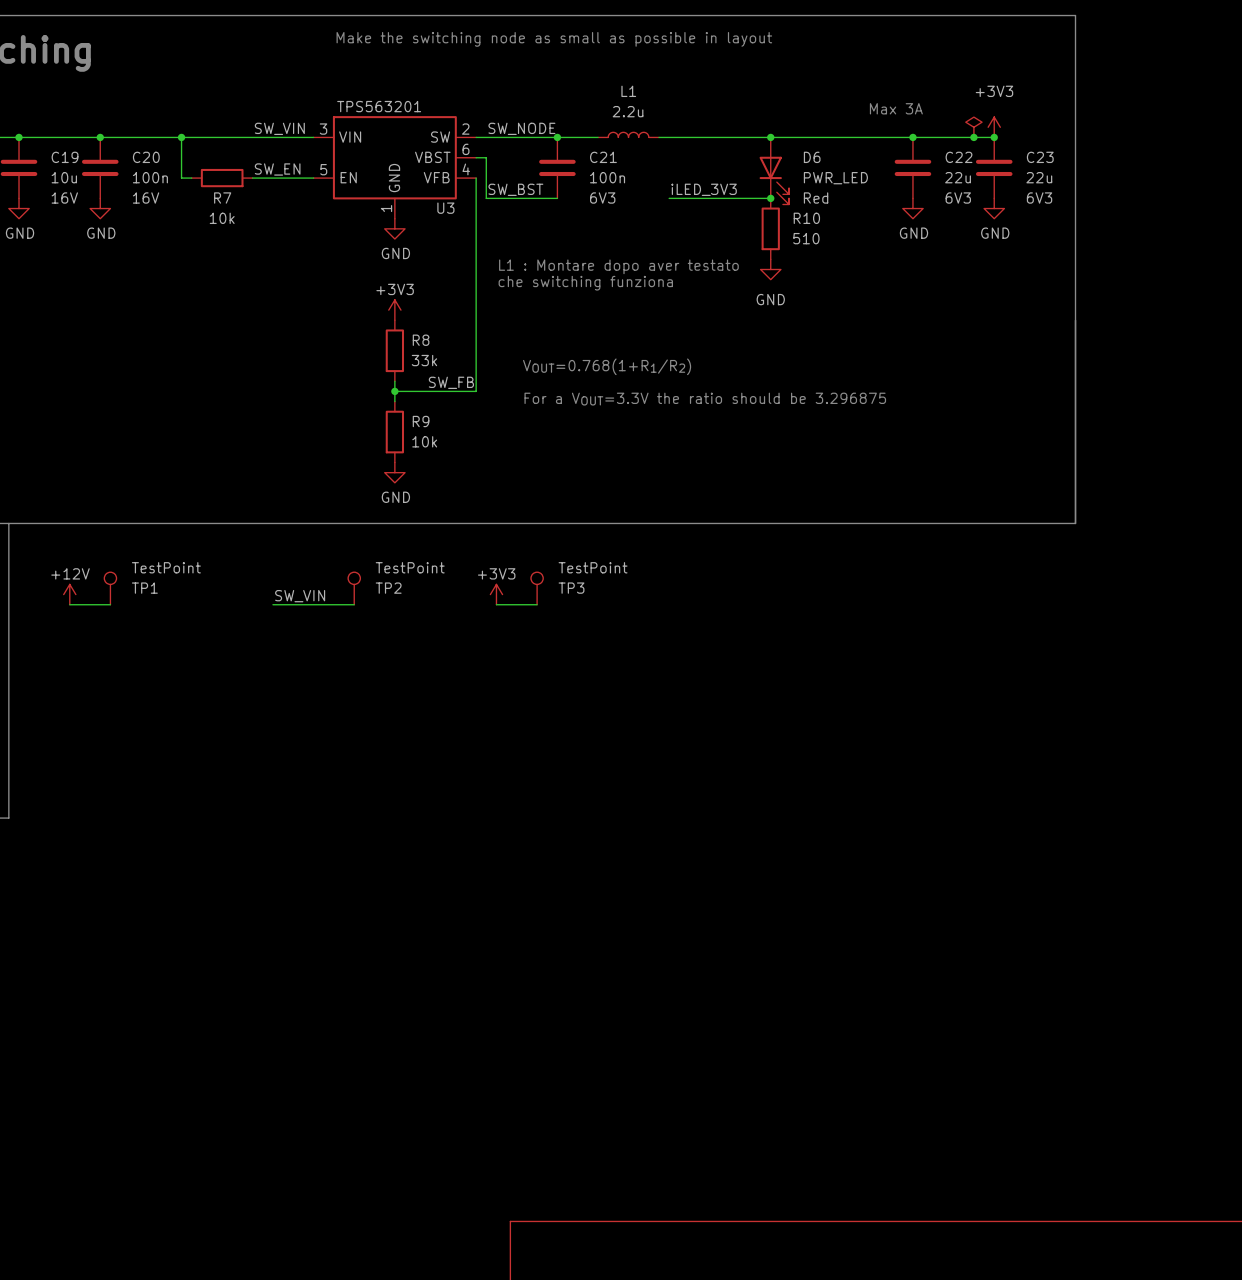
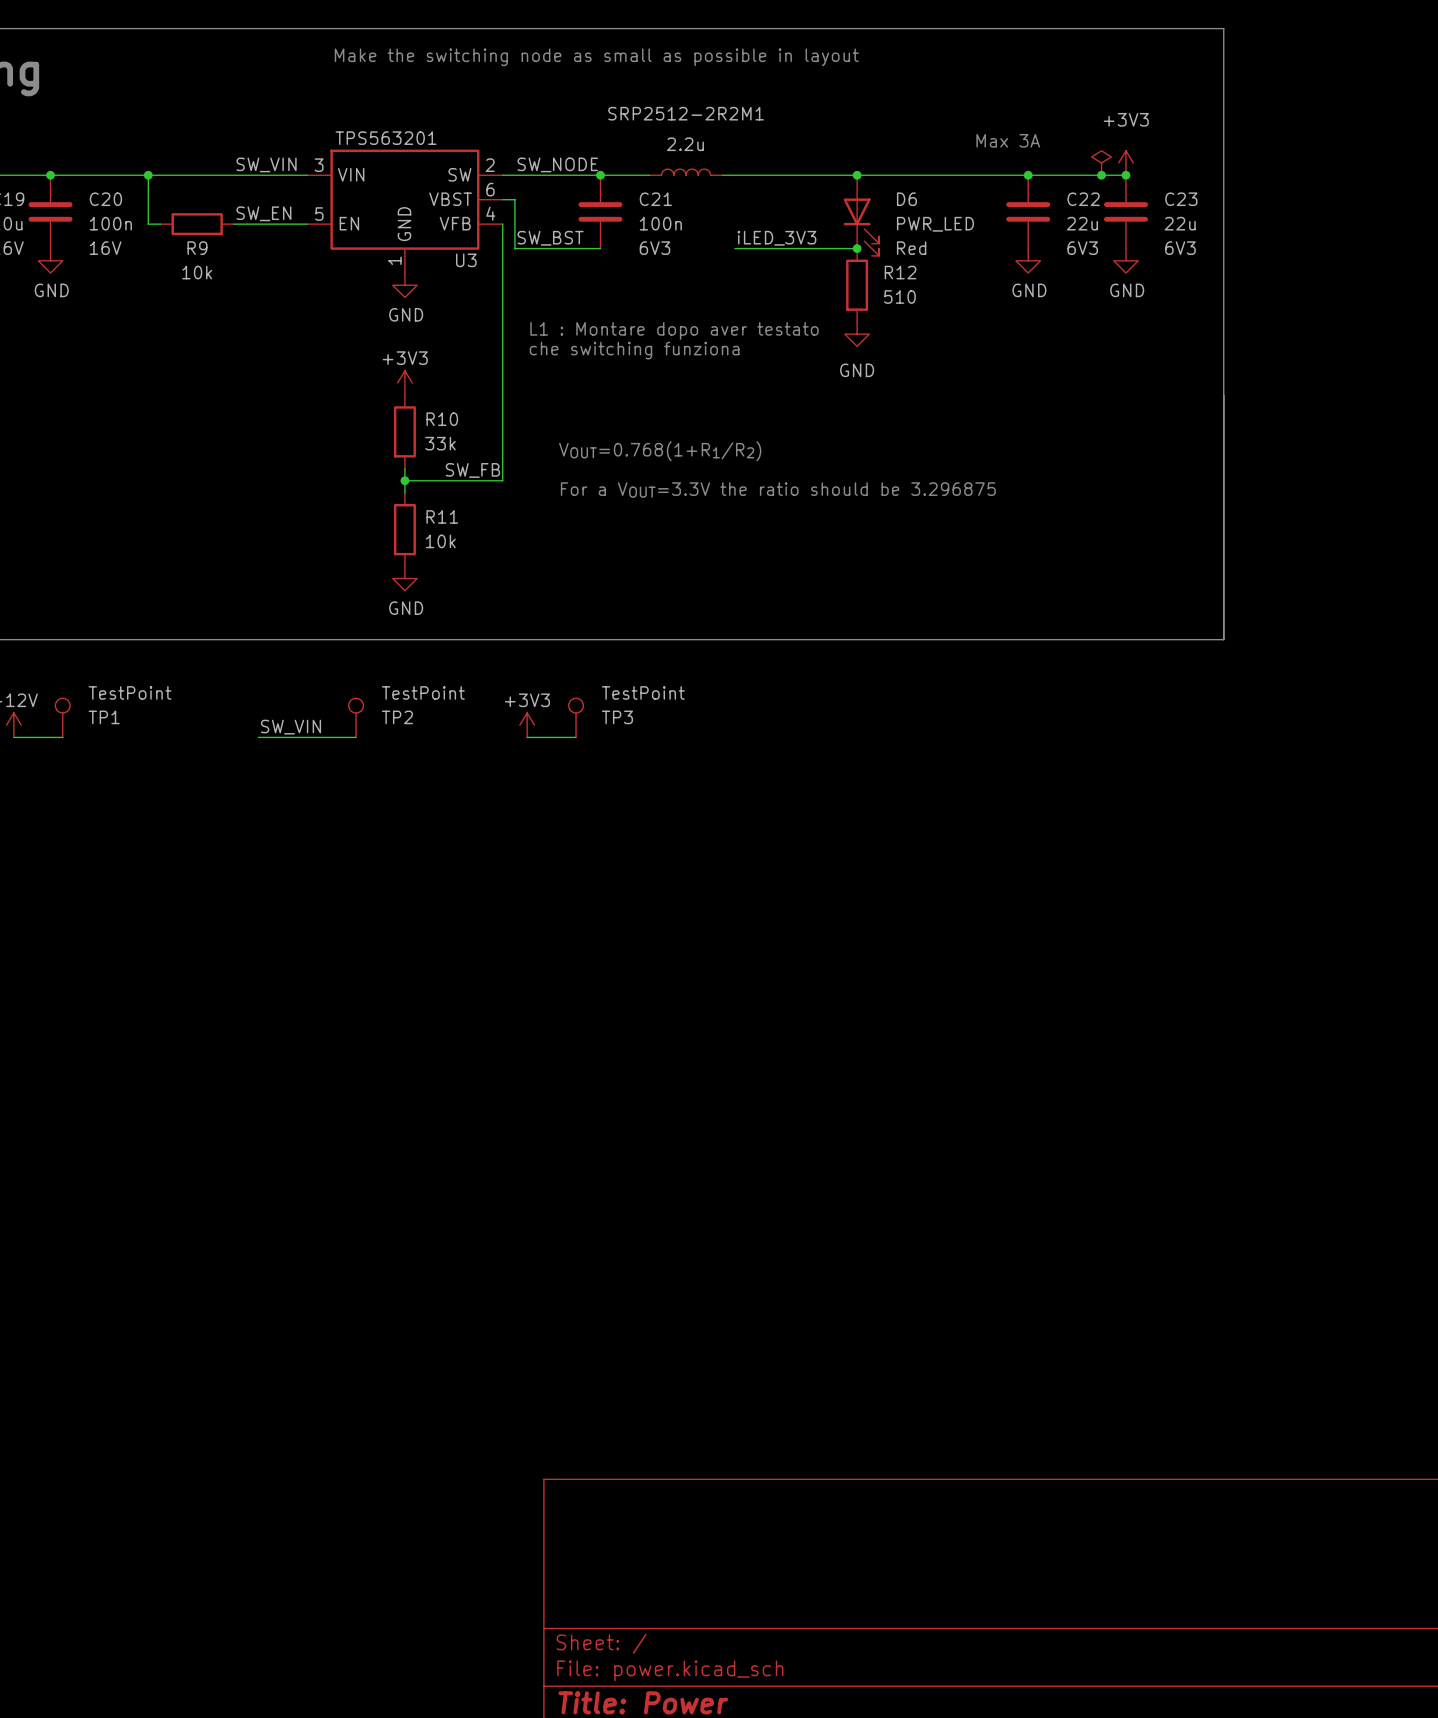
L1 name: L1 (628, 91) -> SRP2512-2R2M1 (686, 113)
R7 name: R7 (222, 198) -> R9 (197, 248)
R10 name: R10 (806, 218) -> R12 (900, 272)
R8 name: R8 (421, 340) -> R10 (442, 419)
R9 name: R9 (421, 421) -> R11 (442, 516)

